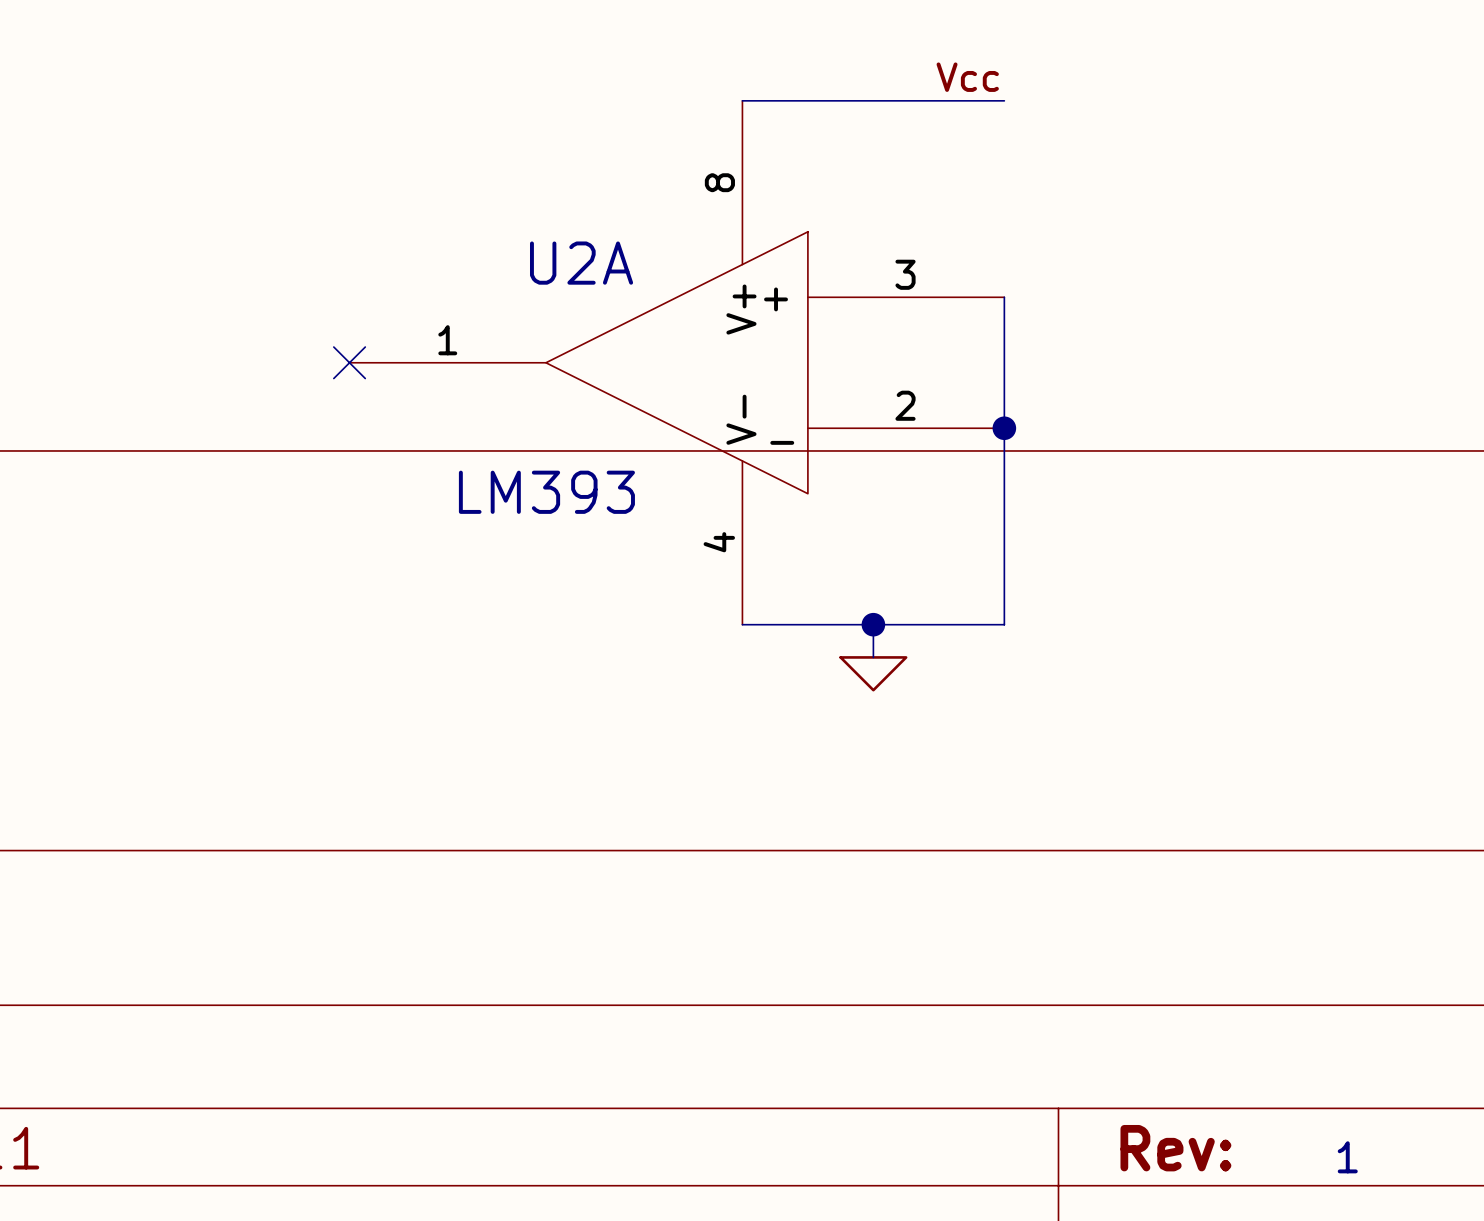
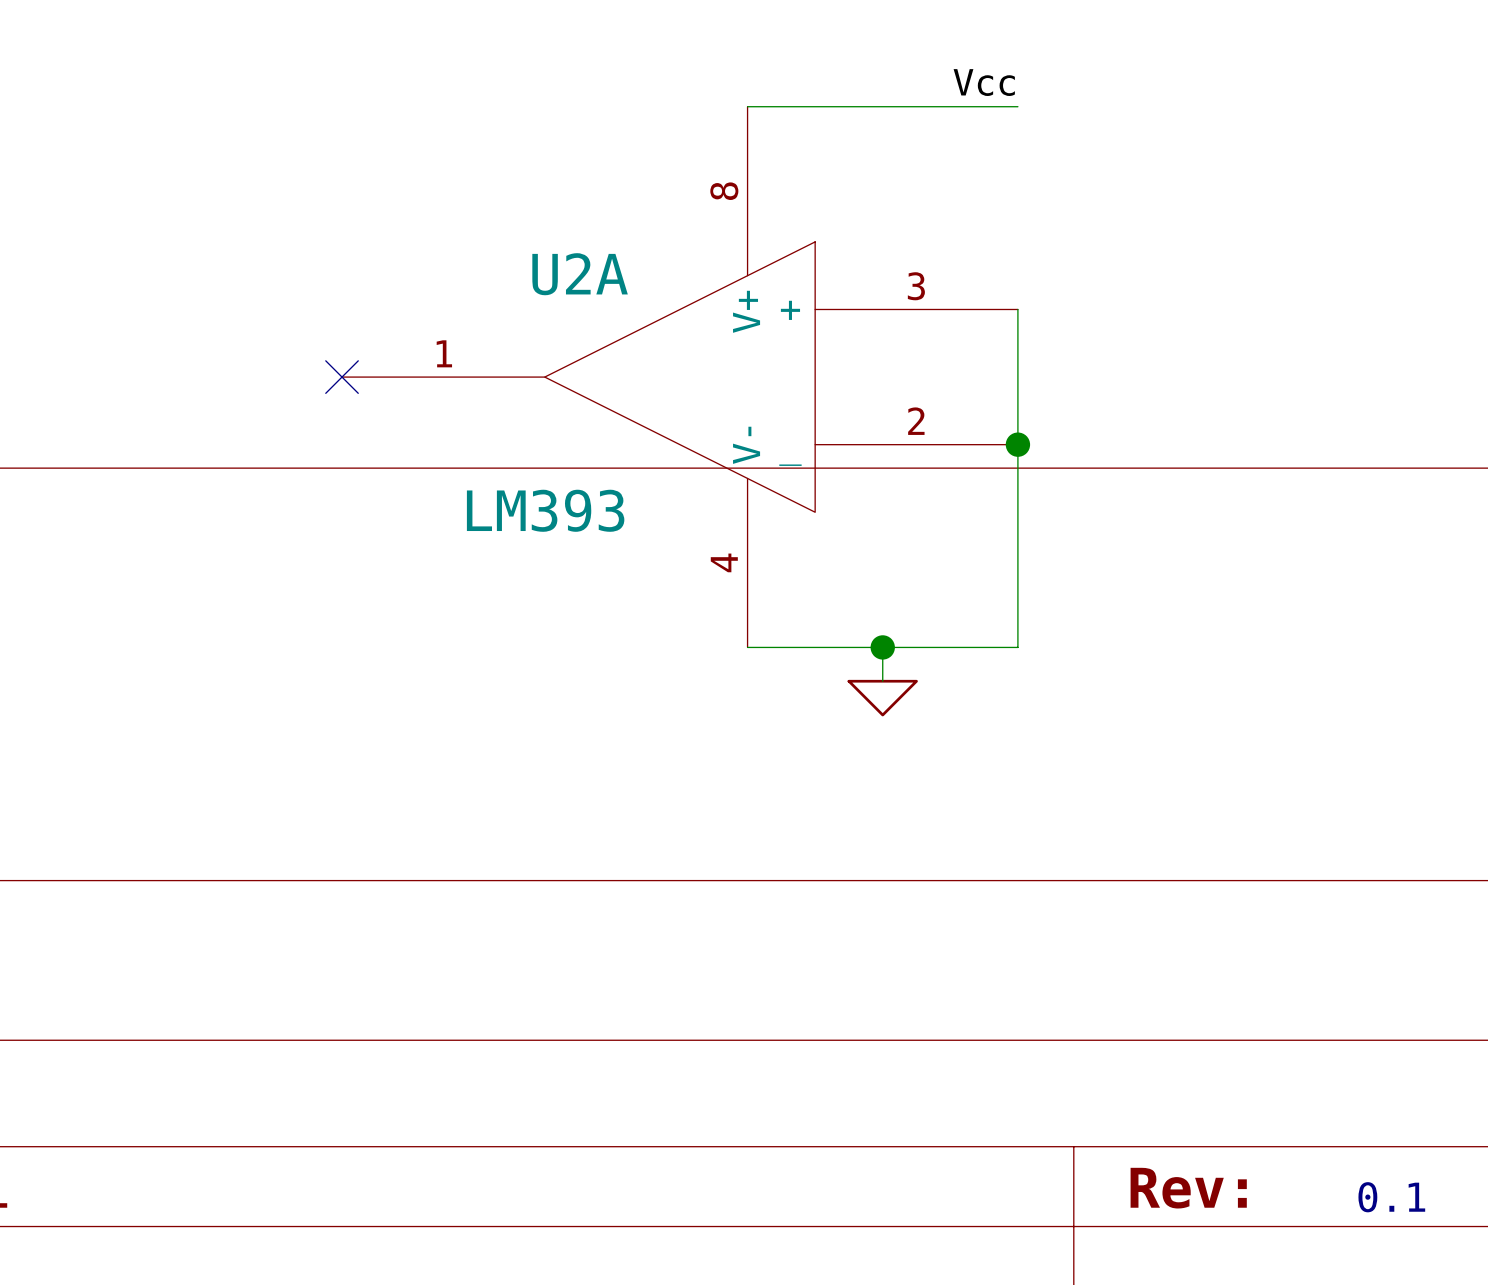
text: 1 (1347, 1157) -> 0.1 (1391, 1197)

